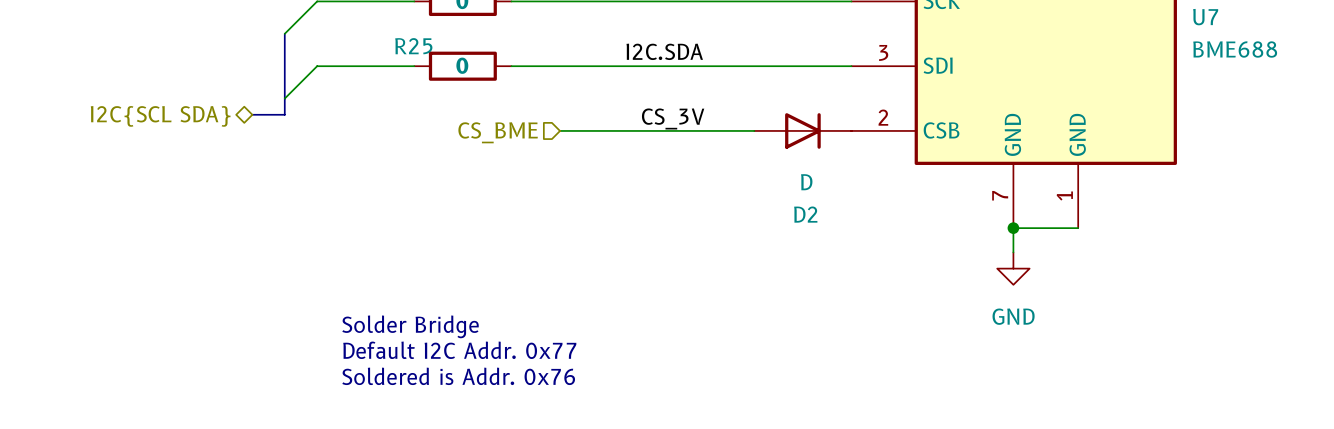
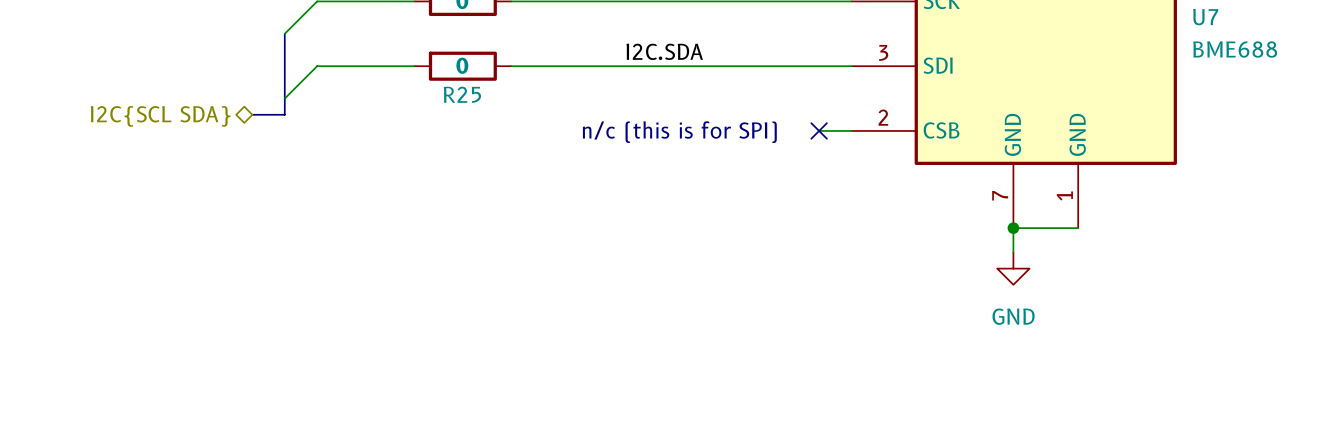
R25 name position: R25 (413, 46) -> R25 (462, 94)
label: CS_3V (673, 118) -> none
wire: (560, 130) (754, 130) -> none
D2: D (802, 130) -> none
no-connect mark: none -> (819, 130)
hierarchical label: CS_BME (498, 132) -> none
text: none -> n/c (this is for SPI) (679, 132)
text: Solder Bridge (410, 326) -> none
text: Default I2C Addr. 0x77 (459, 350) -> none
text: Soldered is Addr. 0x76 (458, 376) -> none

